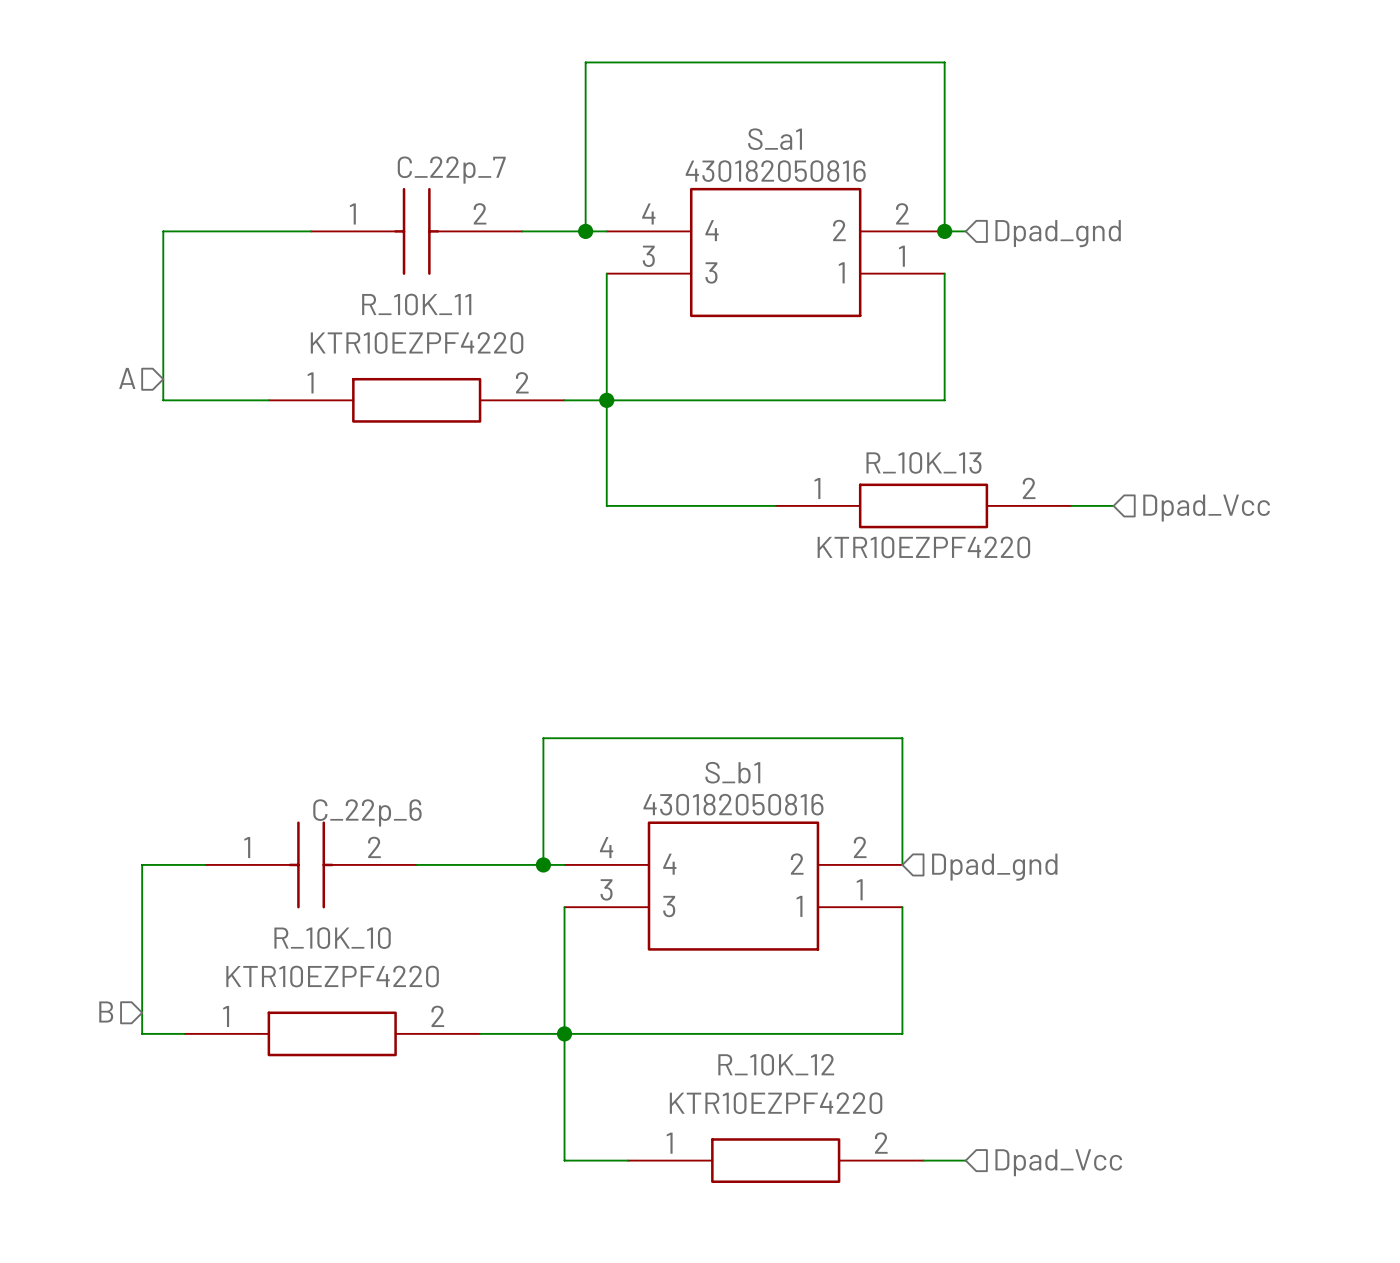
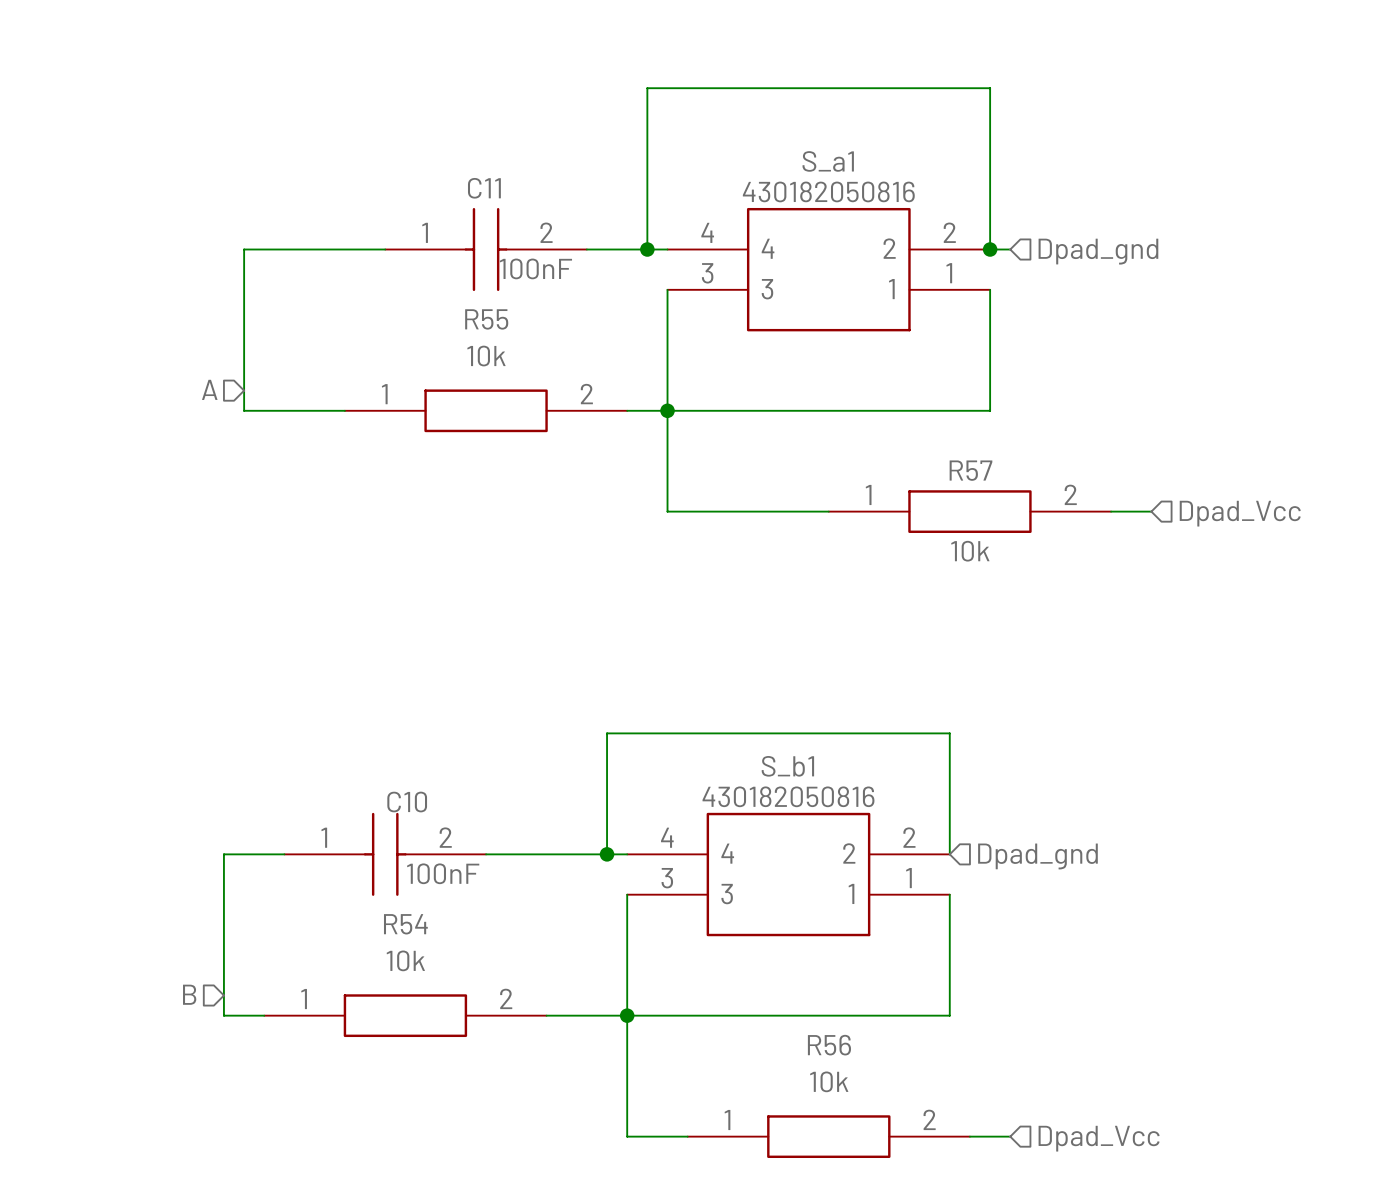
C_22p_7 name: C_22p_7 (451, 170) -> C11 (484, 188)
C_22p_7 value: none -> 100nF (535, 268)
R_10K_11 name: R_10K_11 (416, 304) -> R55 (486, 319)
R_10K_11 value: KTR10EZPF4220 (417, 342) -> 10k (486, 356)
R_10K_13 name: R_10K_13 (923, 462) -> R57 (970, 470)
R_10K_13 value: KTR10EZPF4220 (923, 547) -> 10k (970, 551)
C_22p_6 name: C_22p_6 (367, 812) -> C10 (407, 802)
C_22p_6 value: none -> 100nF (443, 873)
R_10K_10 name: R_10K_10 (332, 938) -> R54 (405, 924)
R_10K_10 value: KTR10EZPF4220 (332, 976) -> 10k (405, 960)
R_10K_12 name: R_10K_12 (776, 1064) -> R56 (829, 1045)
R_10K_12 value: KTR10EZPF4220 (776, 1103) -> 10k (829, 1081)

